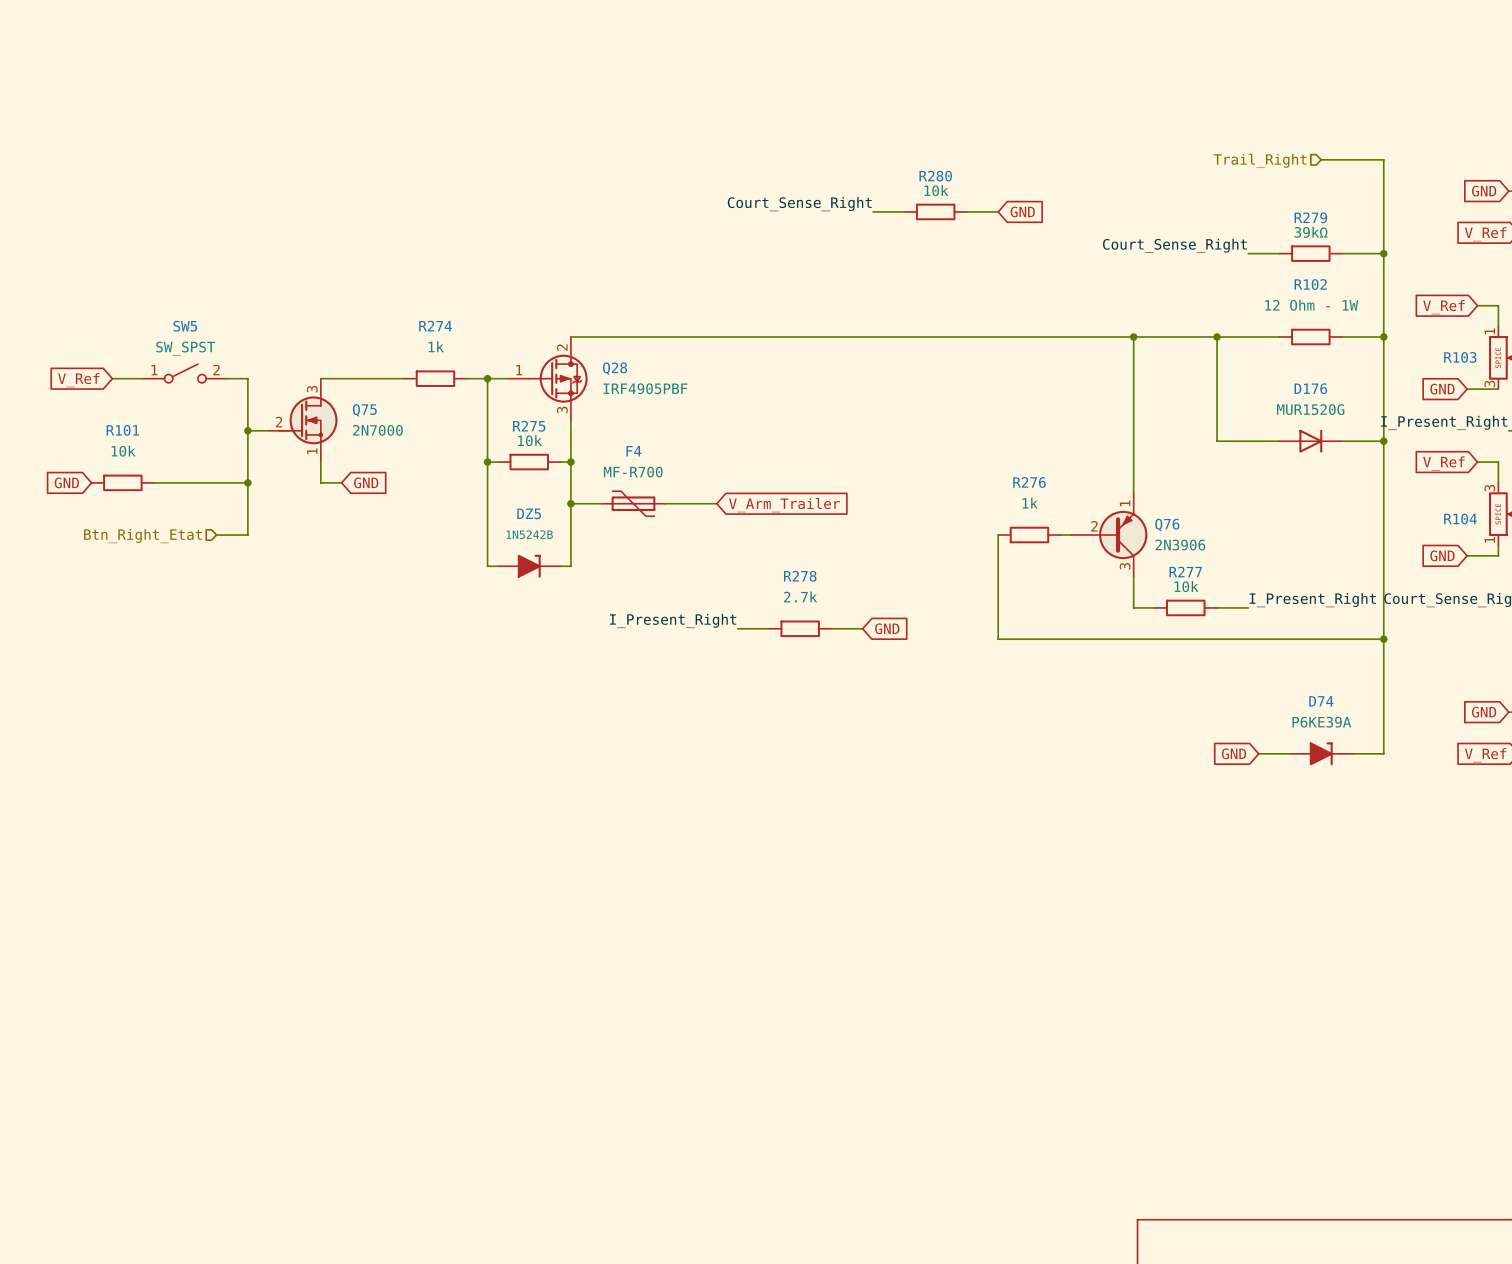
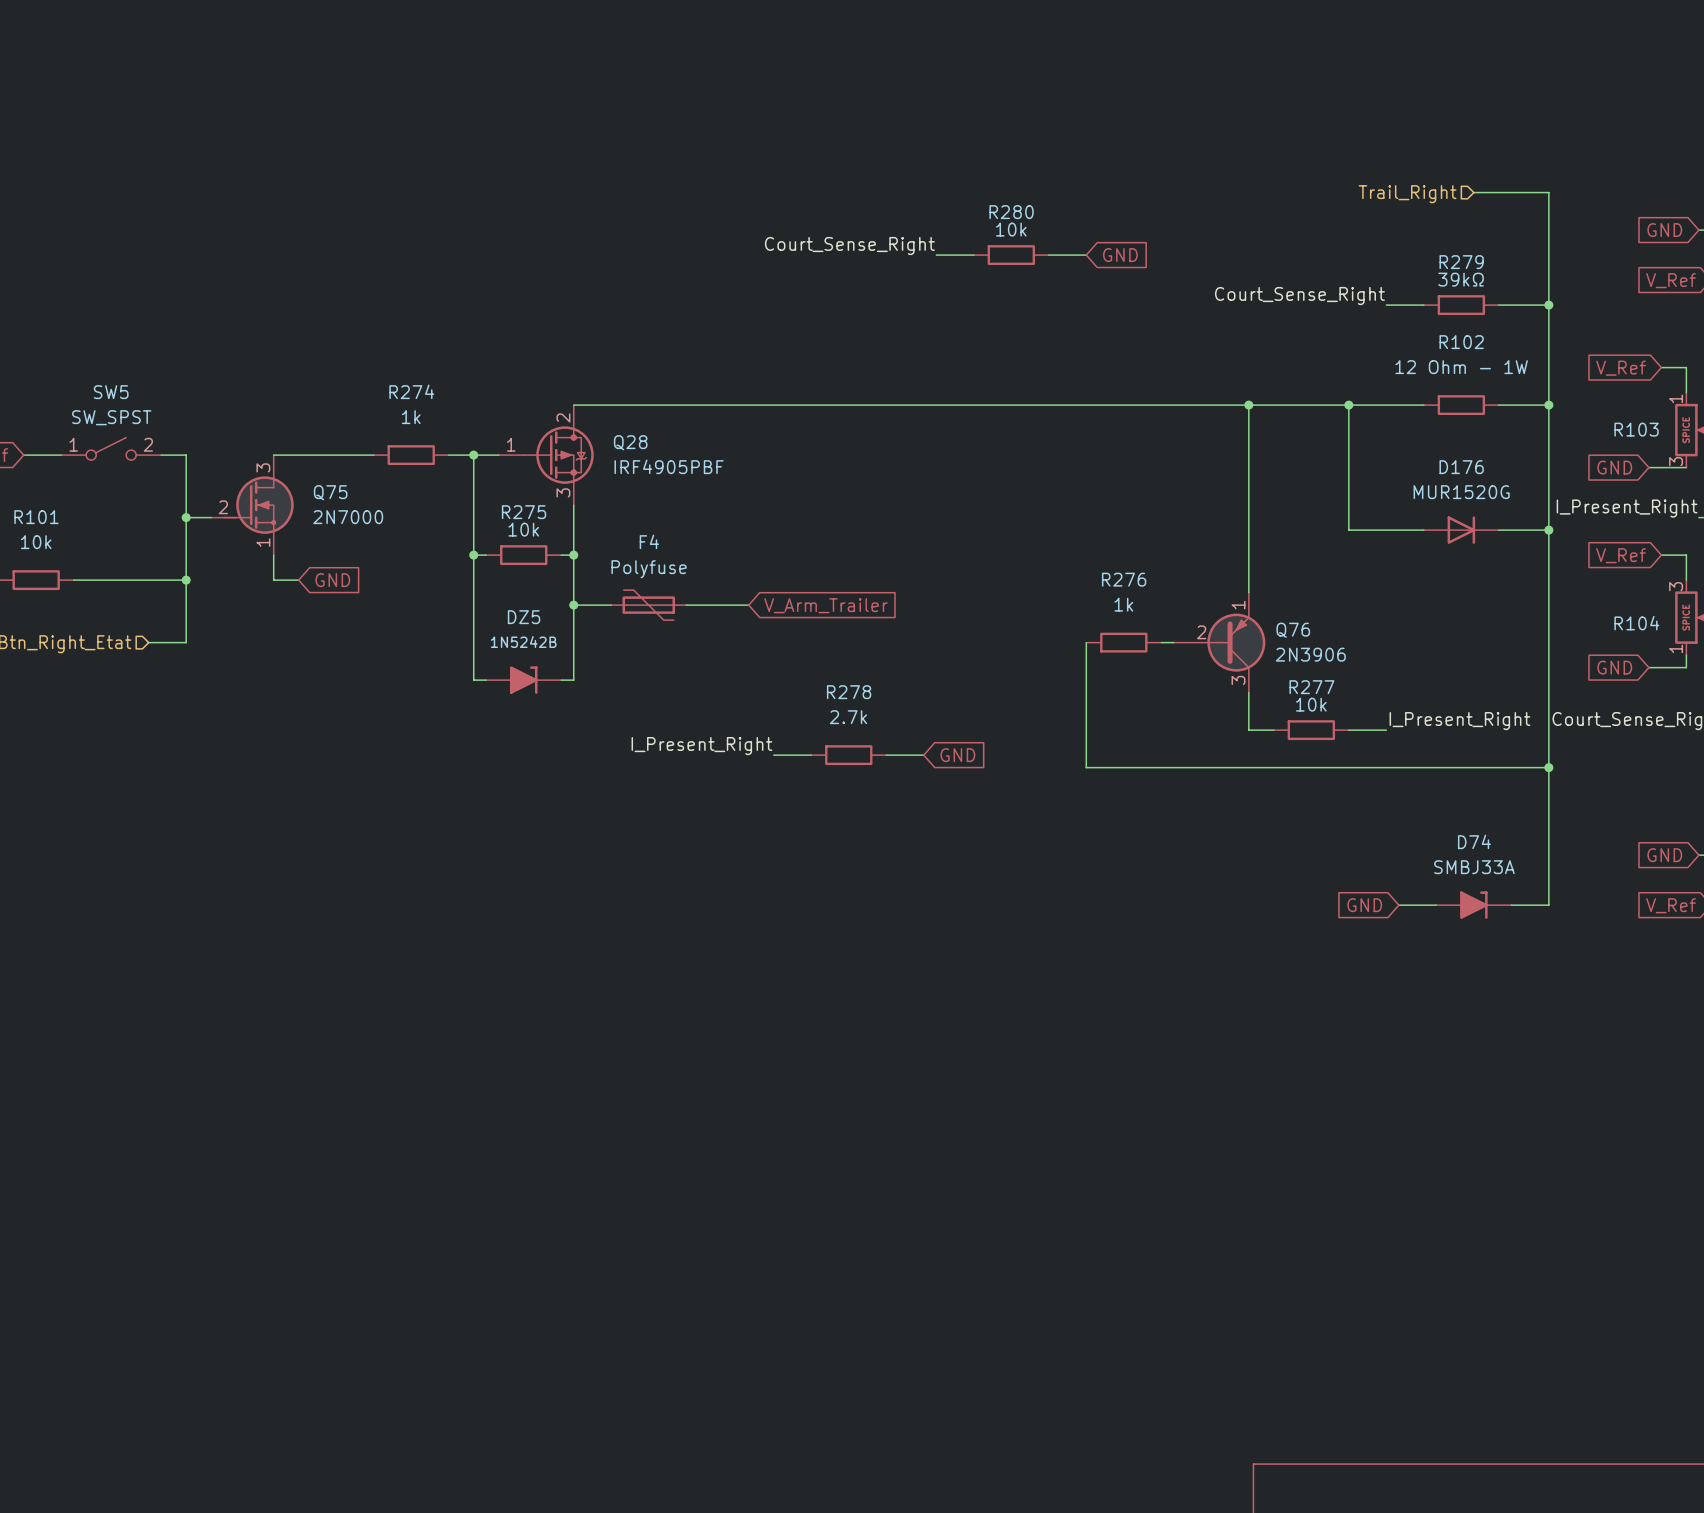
F4 value: MF-R700 (633, 472) -> Polyfuse (649, 569)
D74 value: P6KE39A (1321, 722) -> SMBJ33A (1474, 867)

